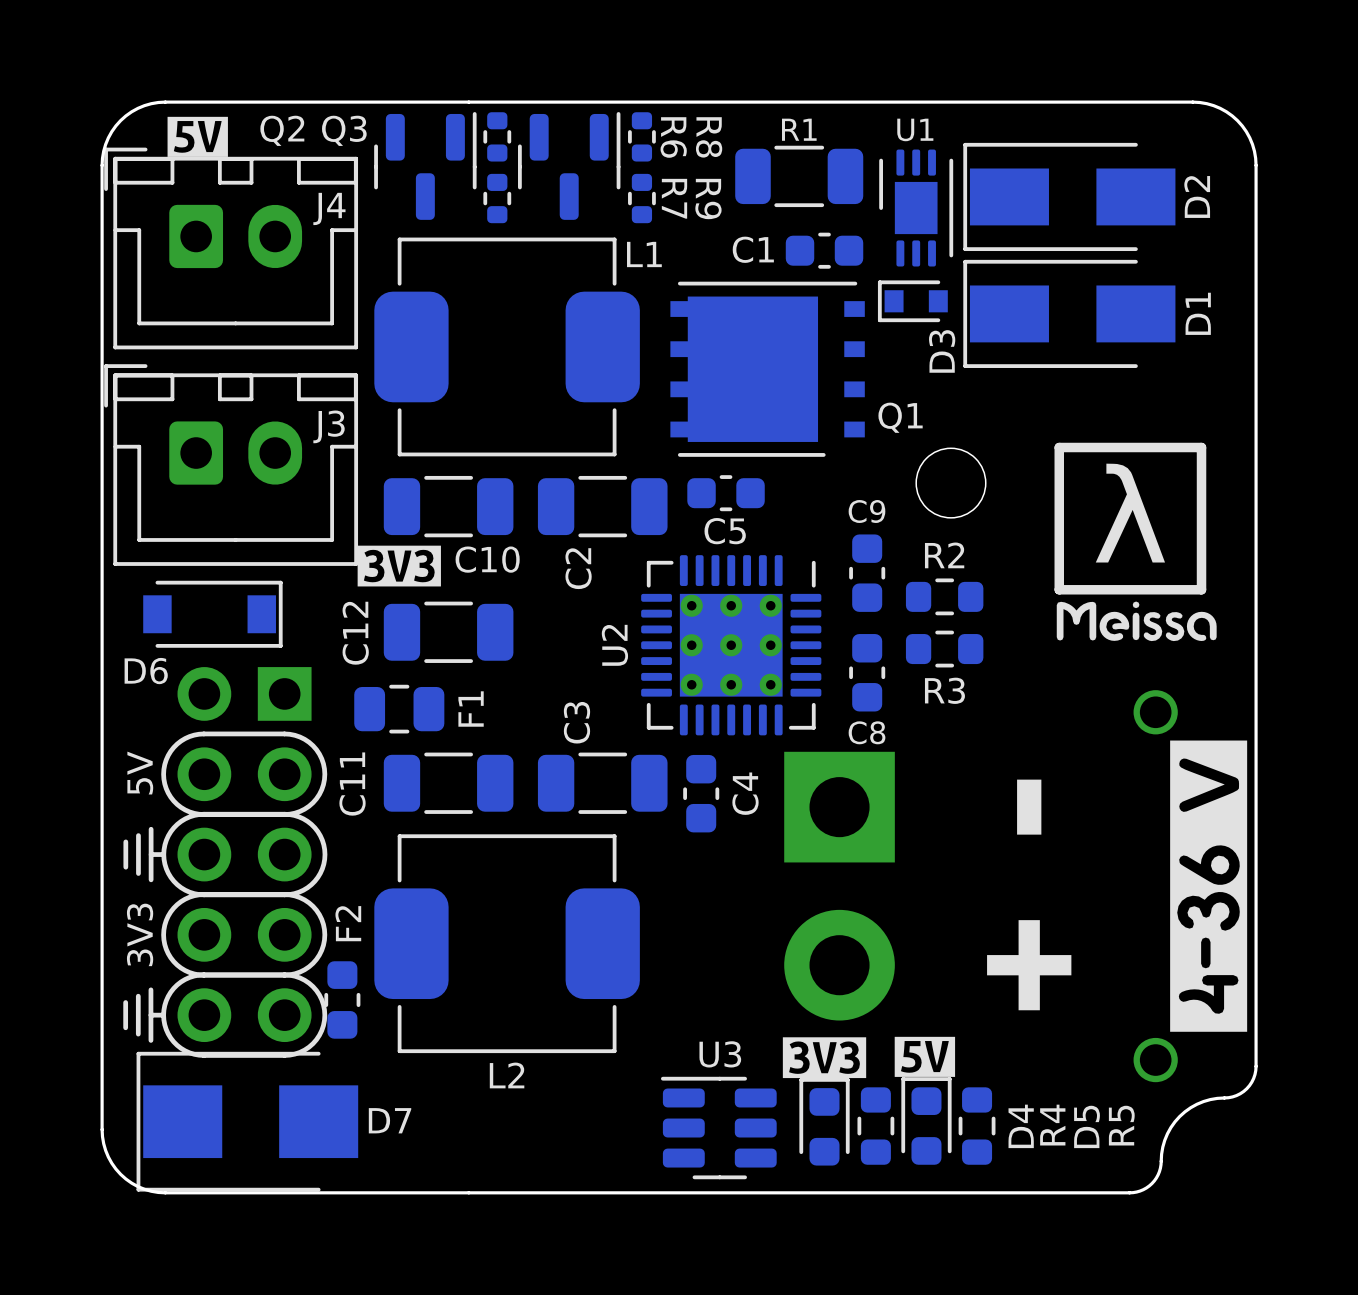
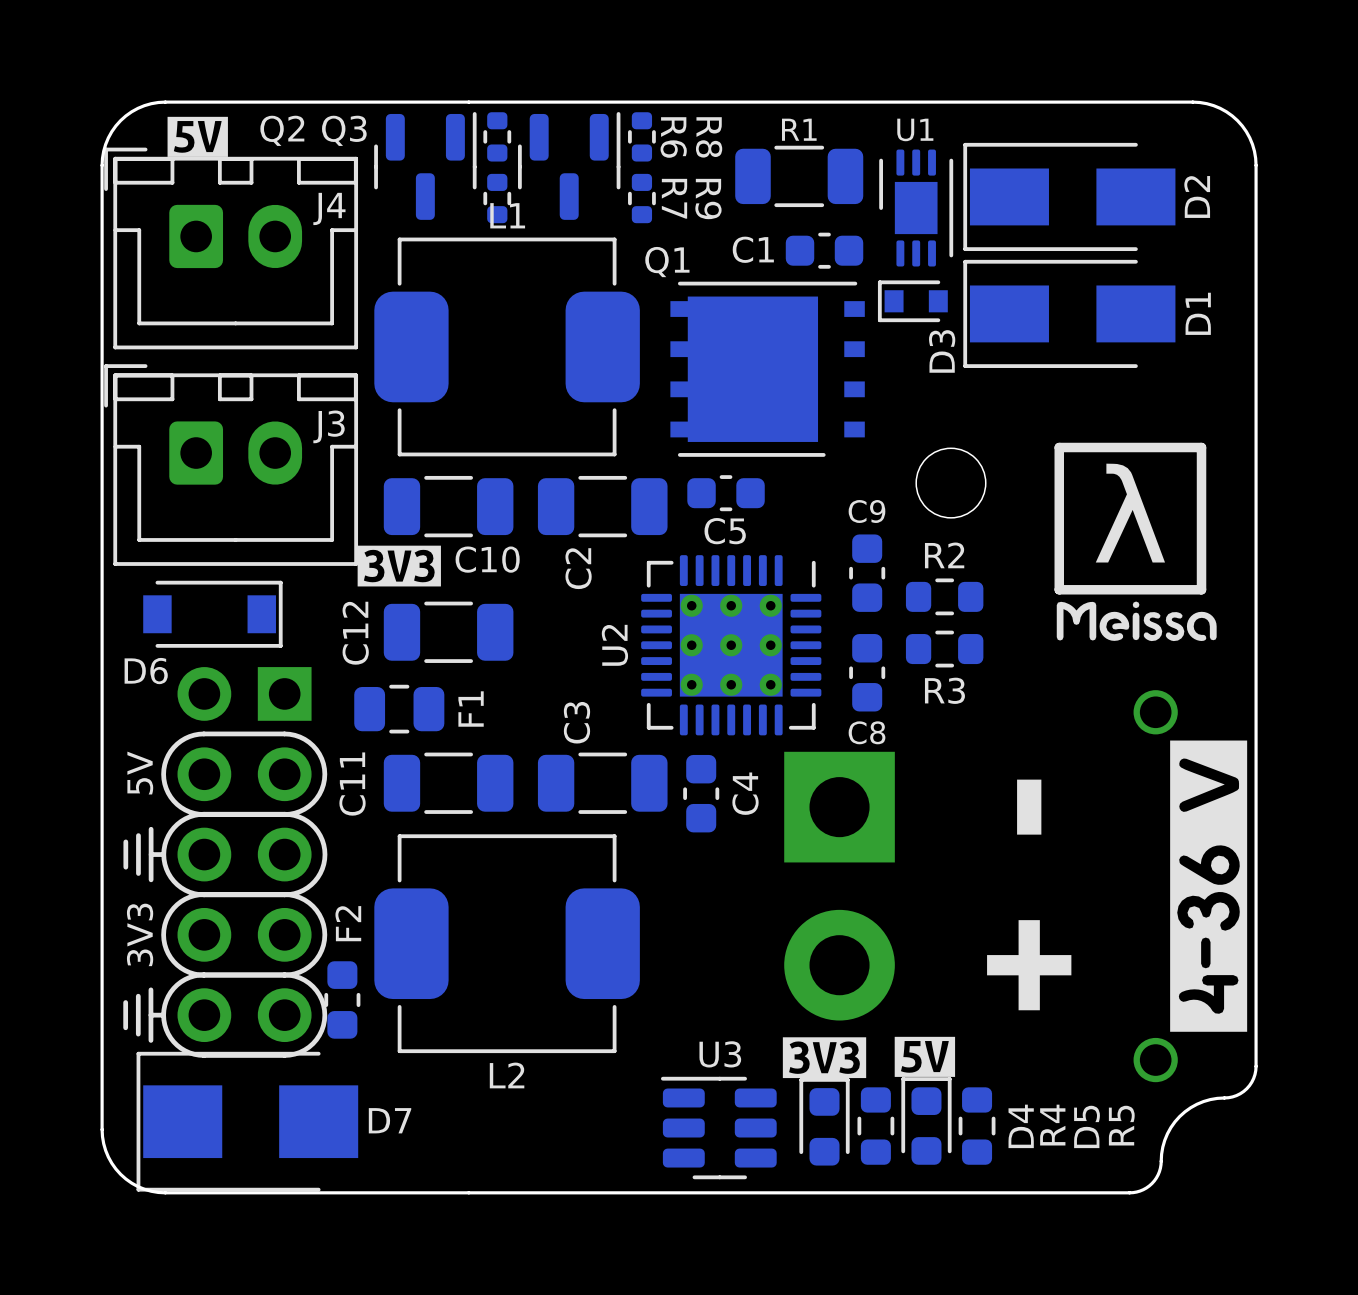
L1 name position: L1 (644, 254) -> L1 (507, 215)
Q1 name position: Q1 (900, 417) -> Q1 (667, 262)

